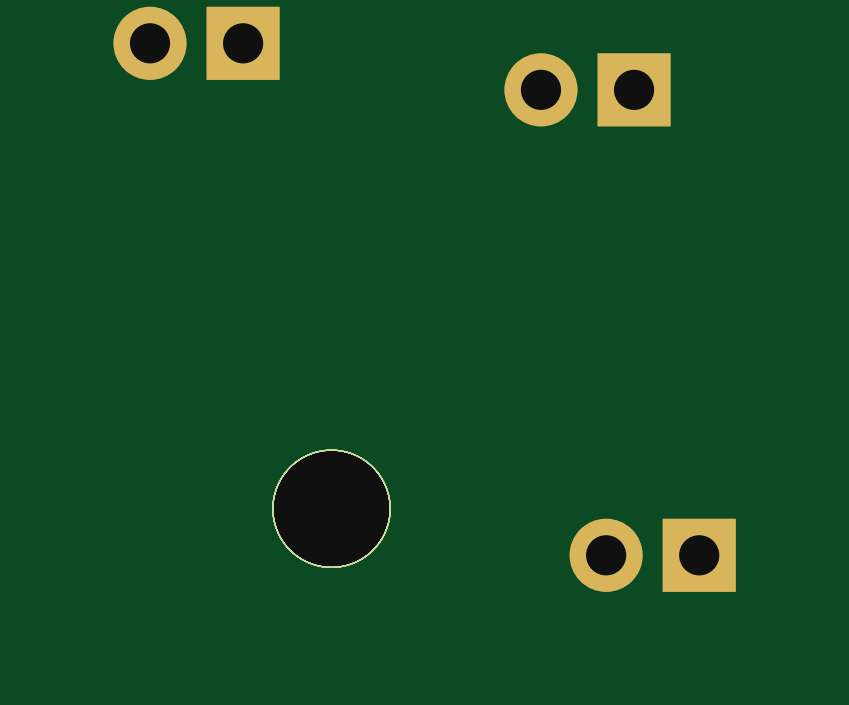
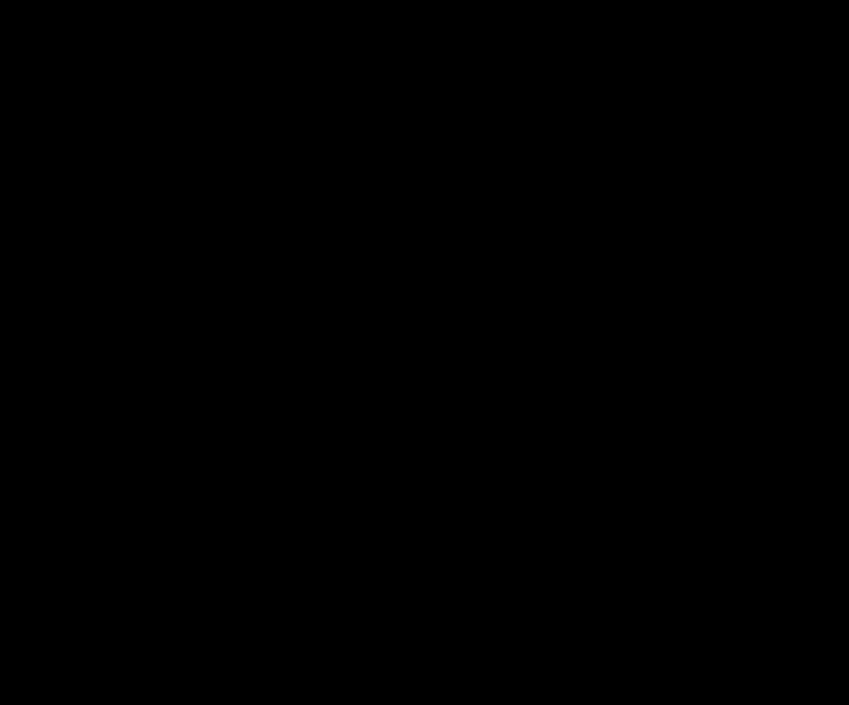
part: (196, 43) -> none
part: (587, 89) -> none
part: (331, 508) -> none
part: (652, 555) -> none

